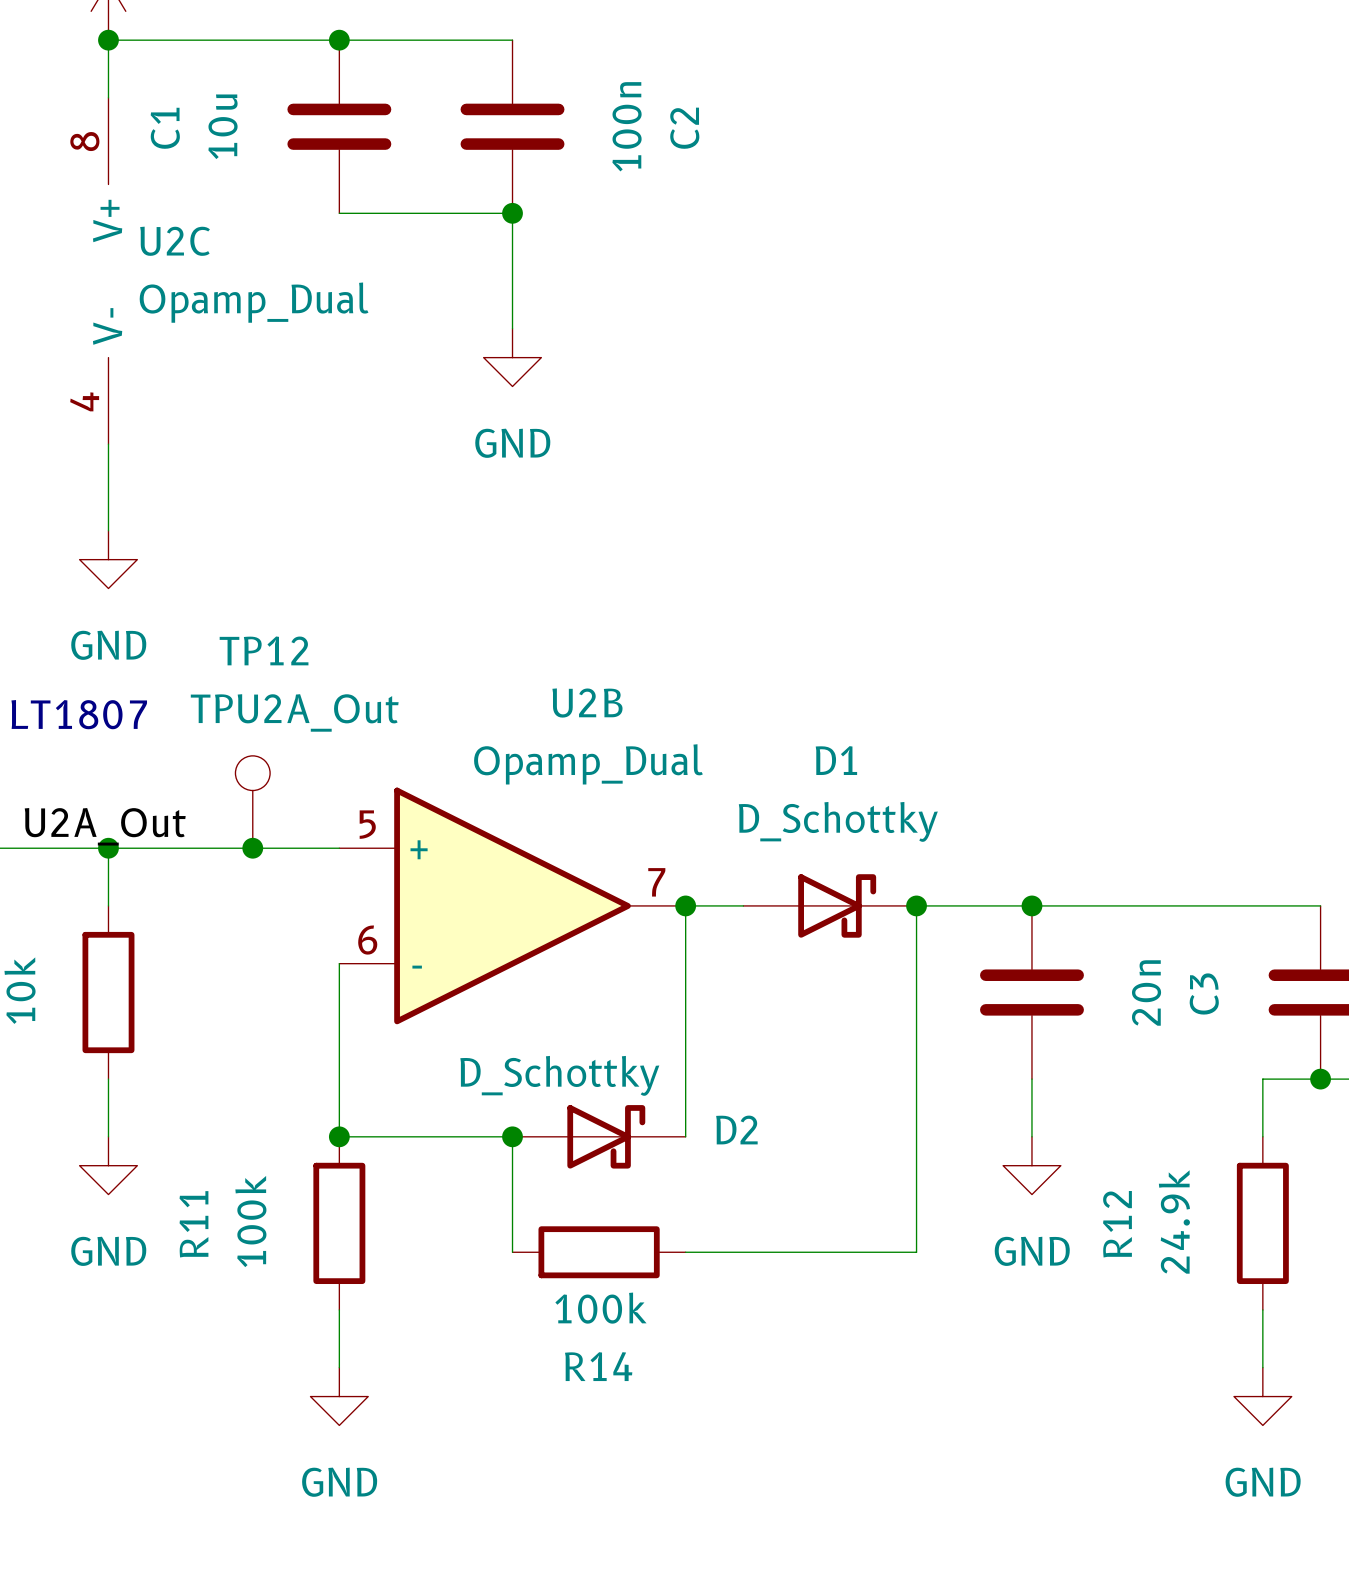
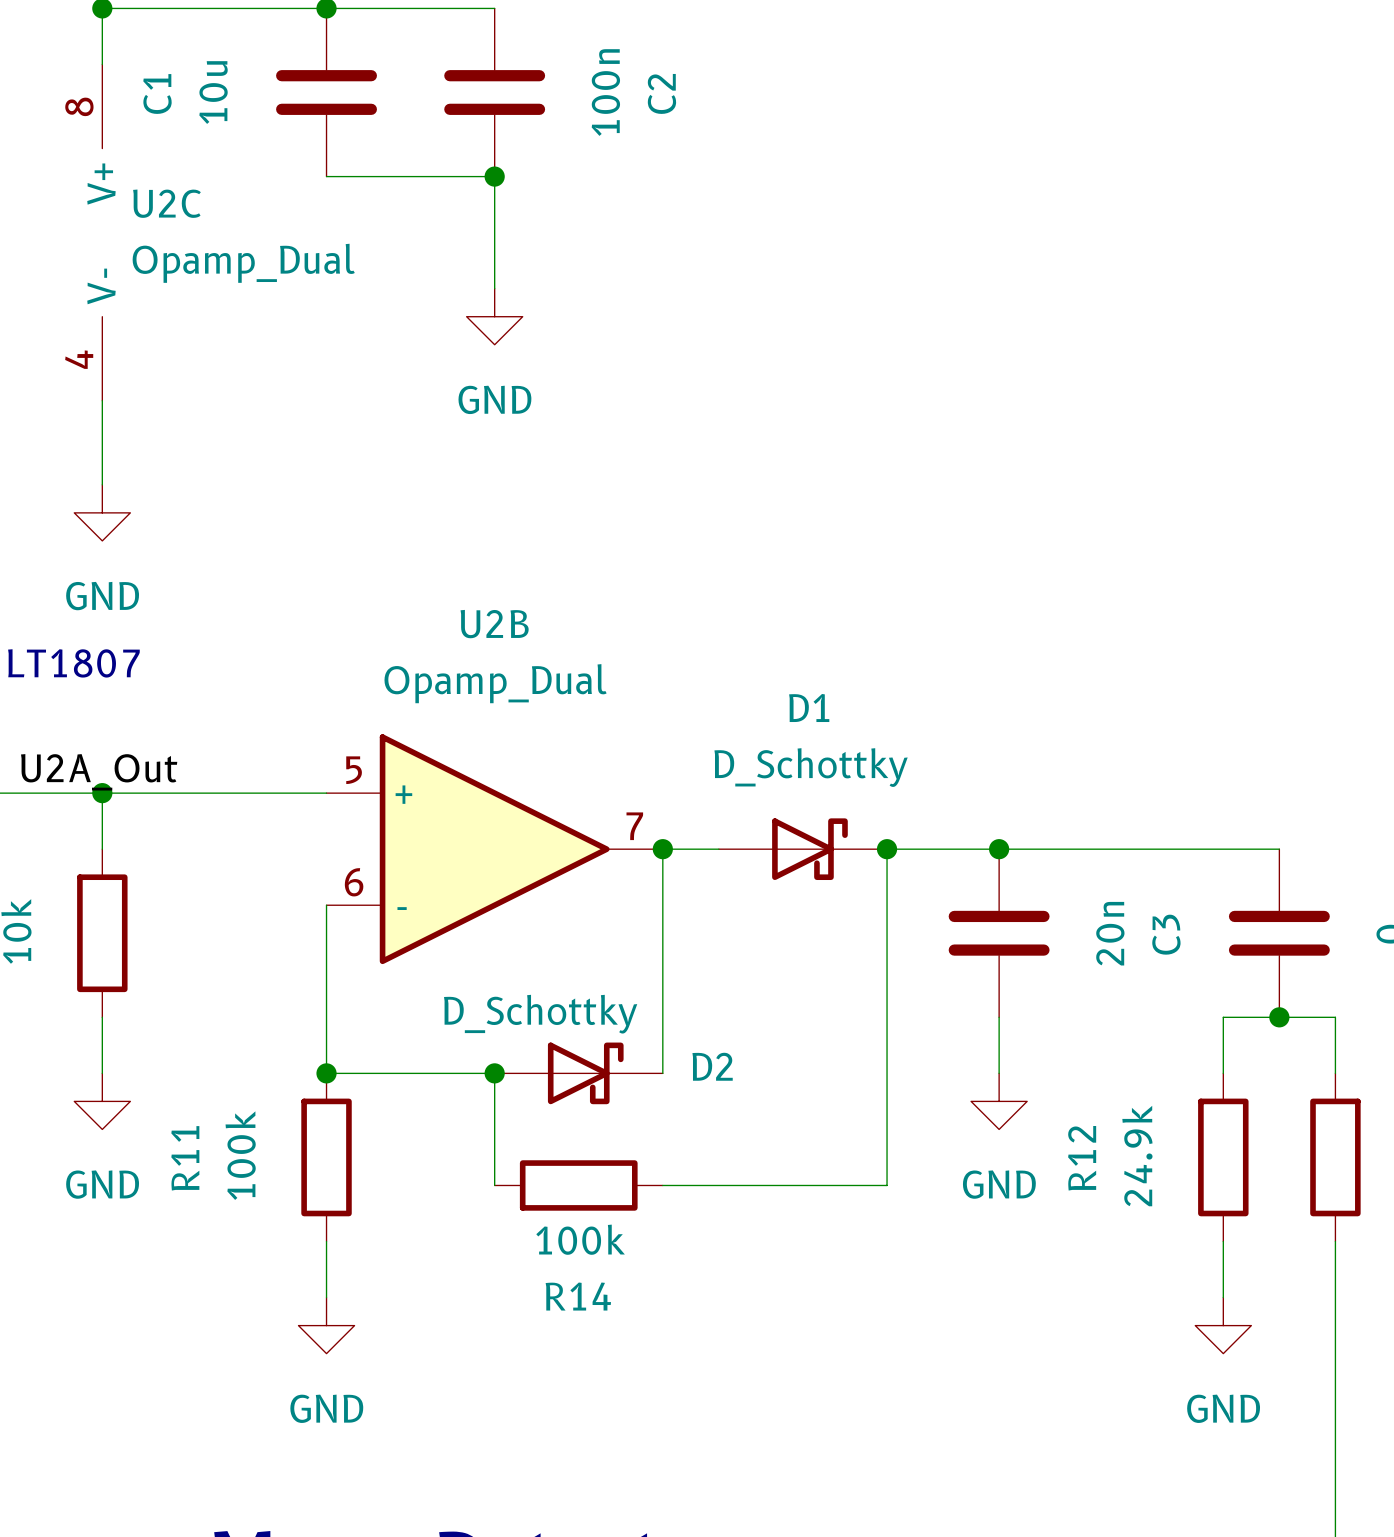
U2B name position: U2B (587, 703) -> U2B (494, 624)
U2B value position: Opamp_Dual (588, 764) -> Opamp_Dual (495, 683)
TP12: TPU2A_Out (252, 802) -> none
junction: (252, 848) -> none

